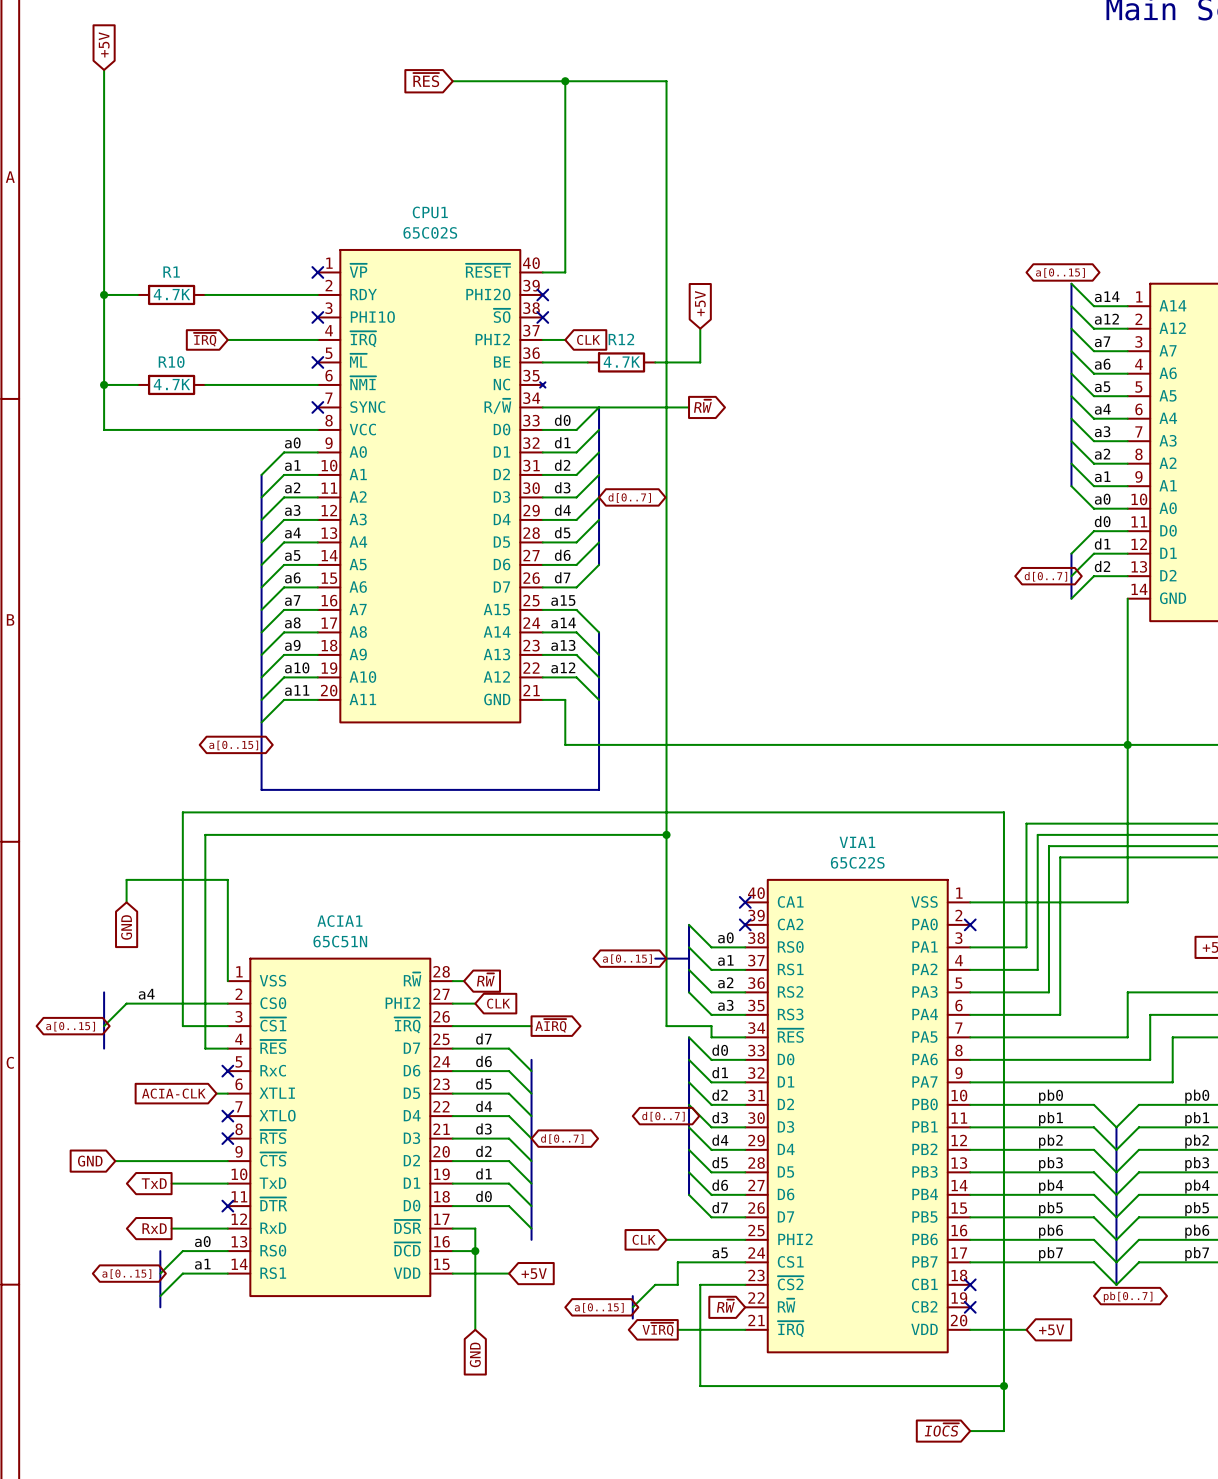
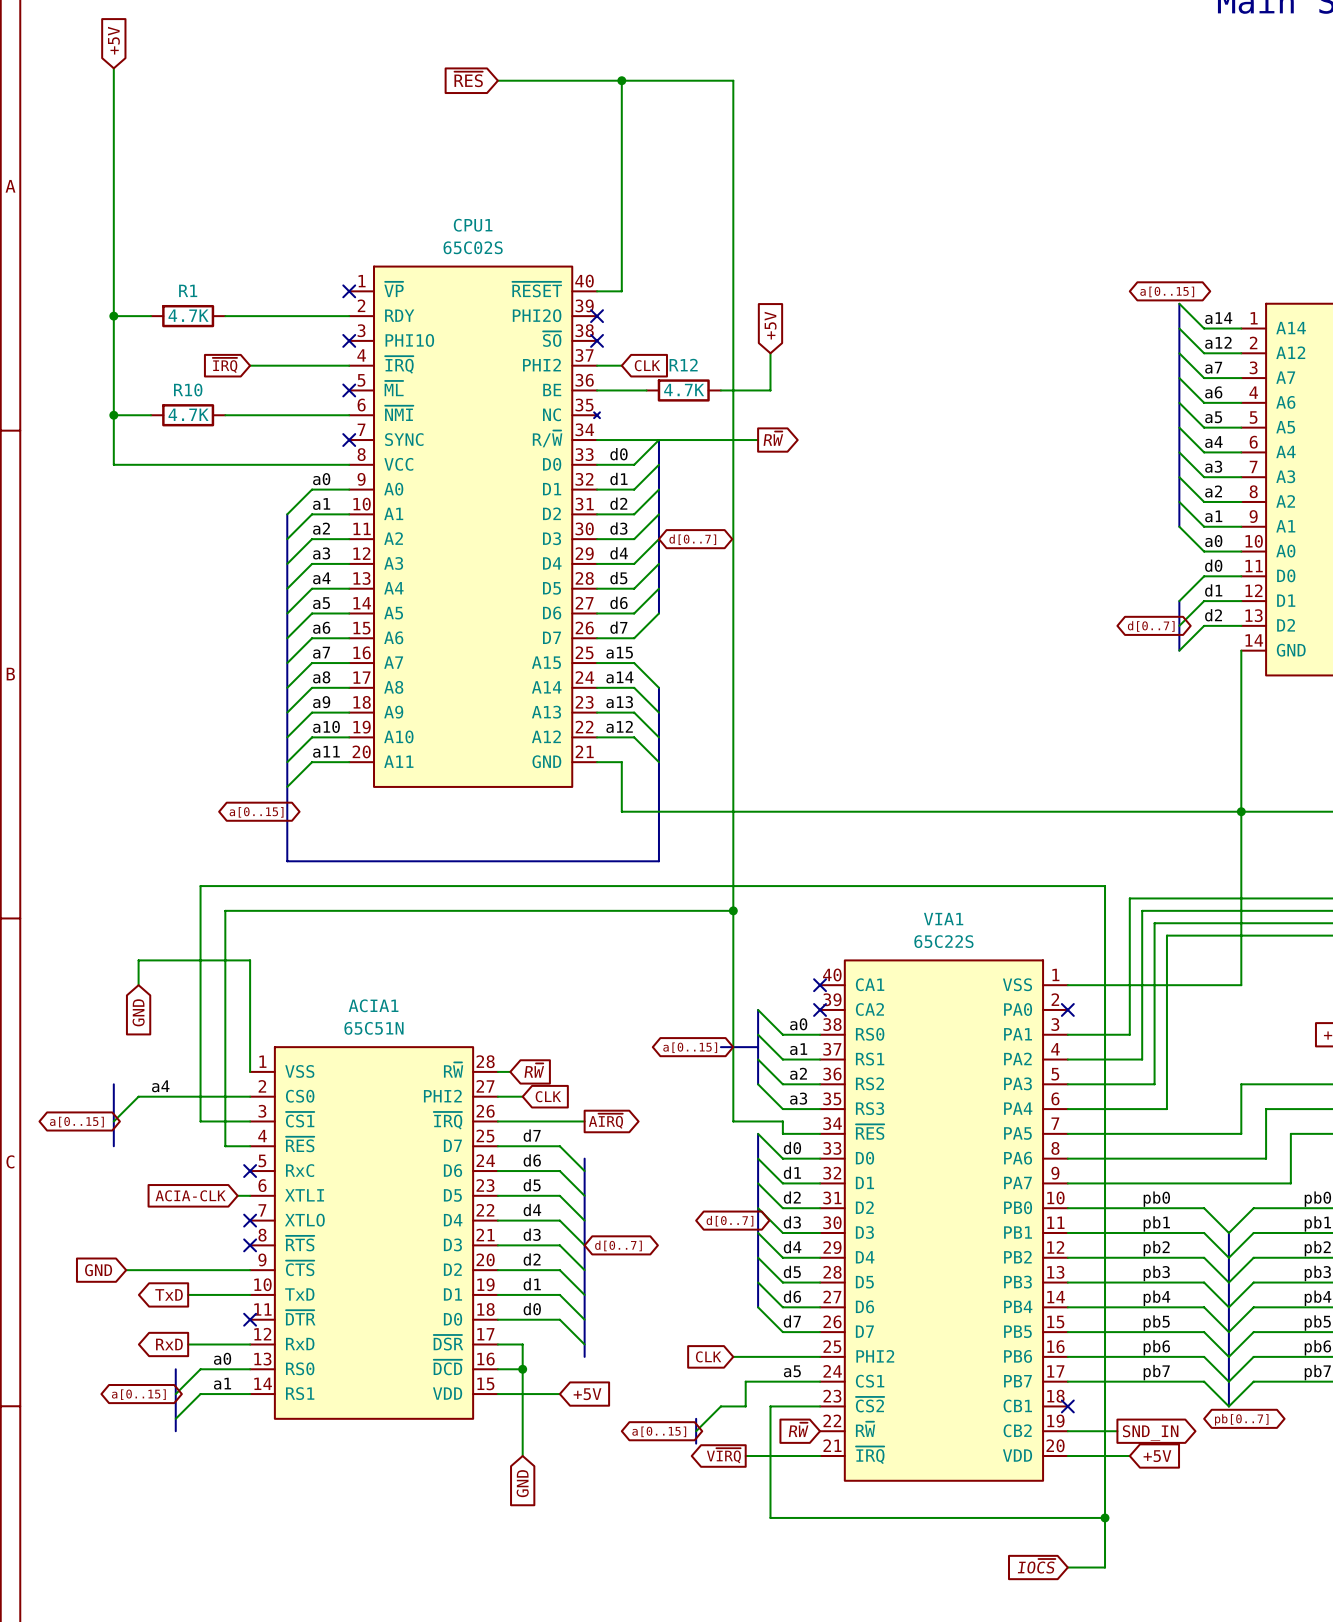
wire: none -> (1067, 1431) (1117, 1431)
no-connect mark: (970, 1307) -> none
global label: none -> SND_IN (1150, 1433)

